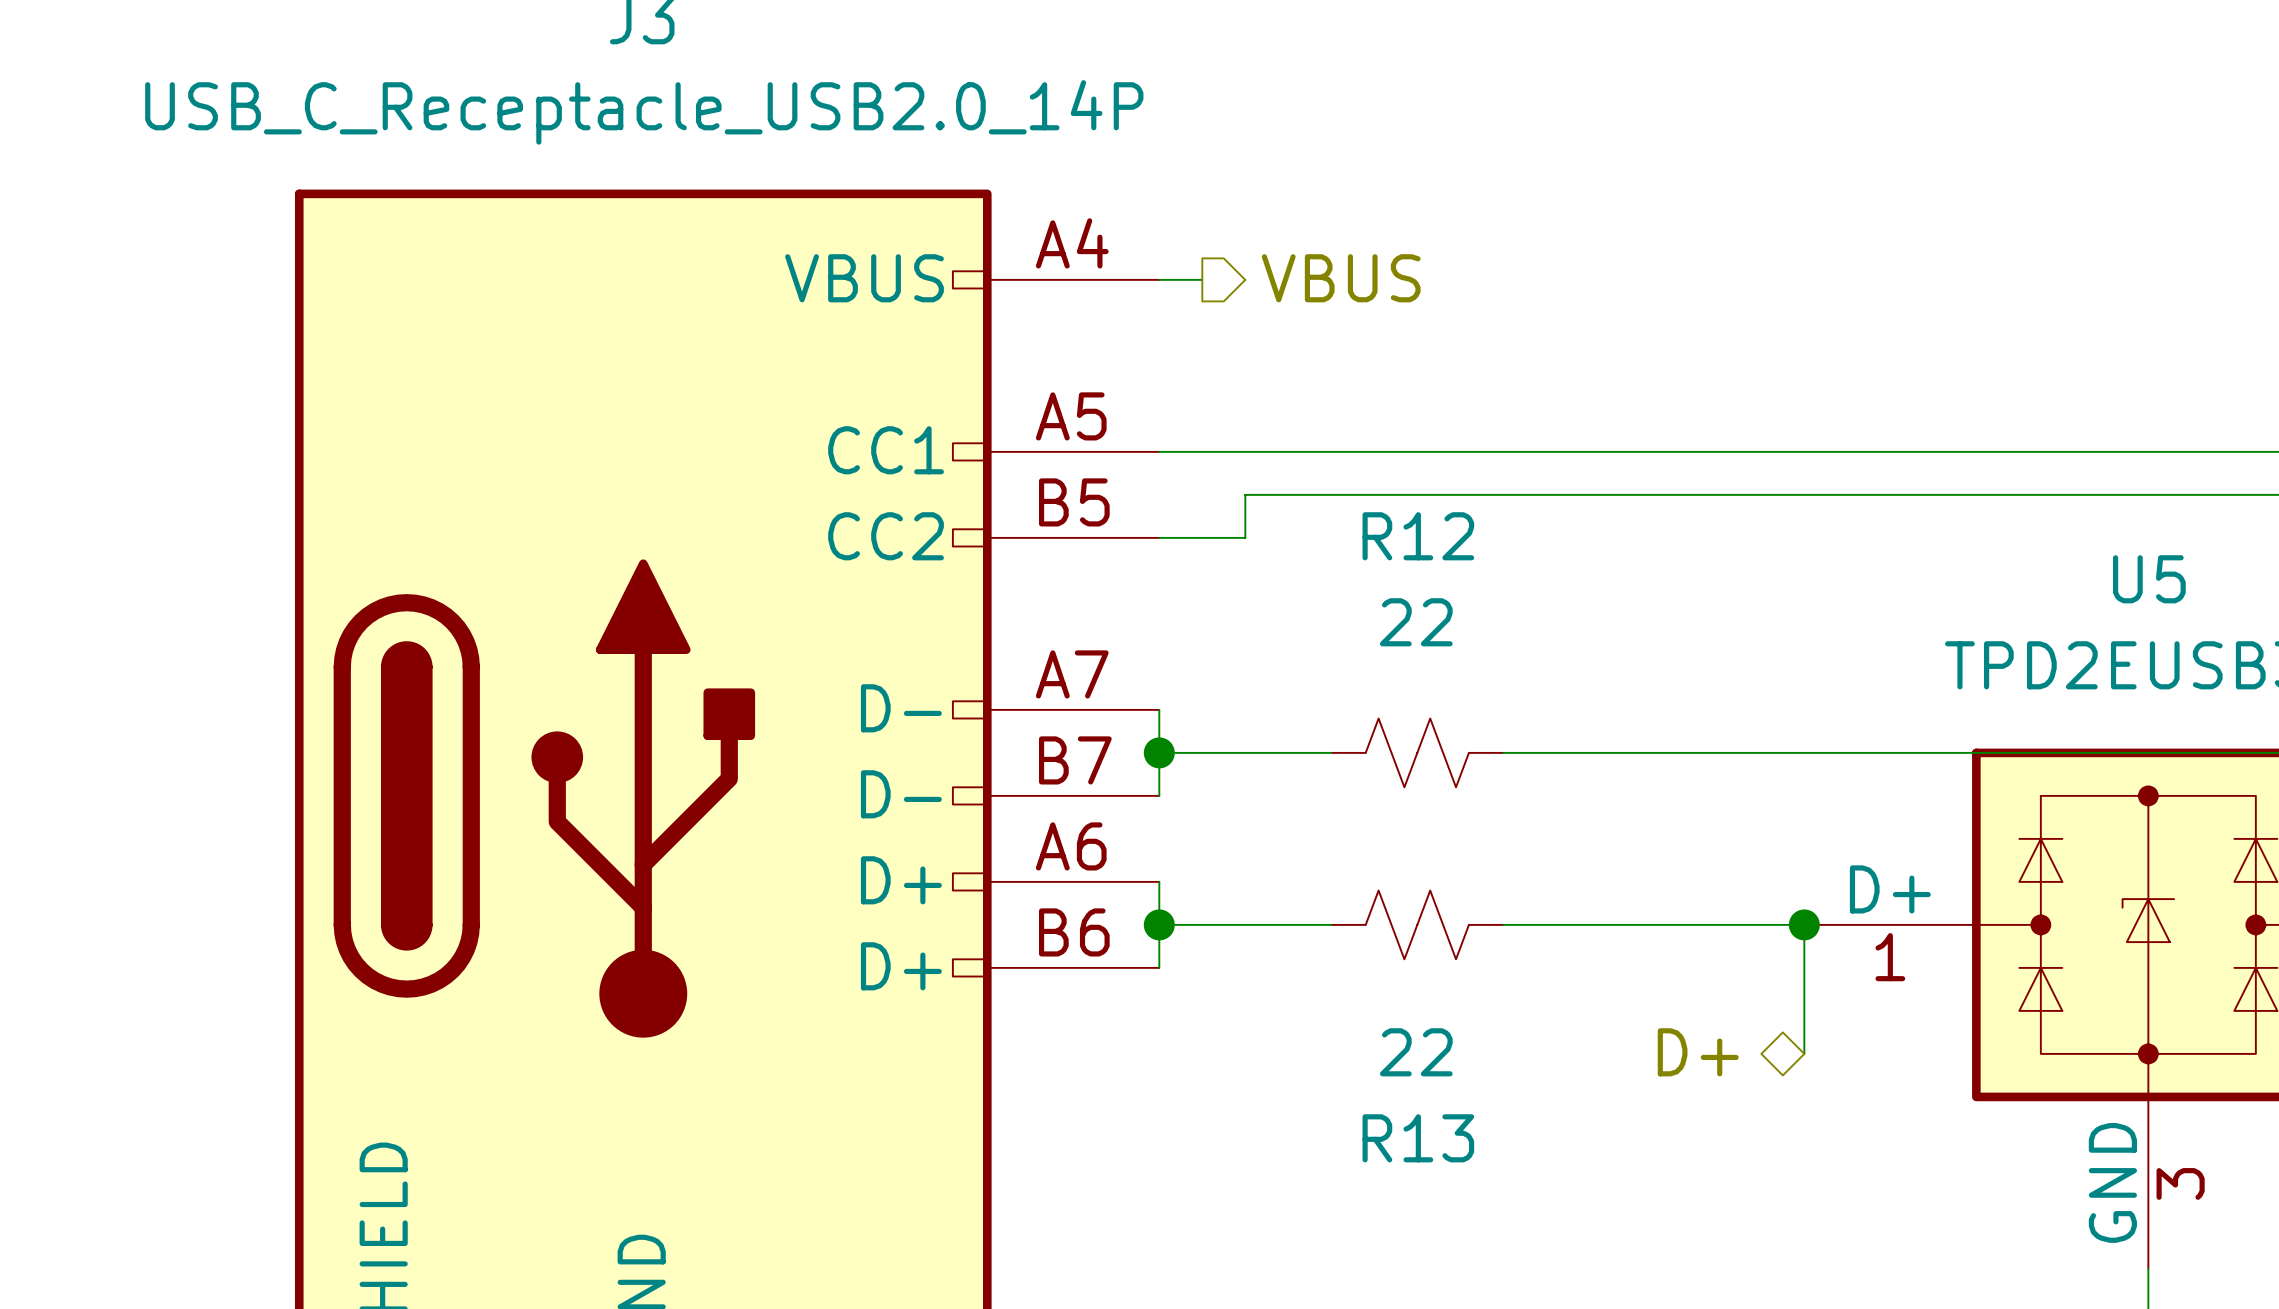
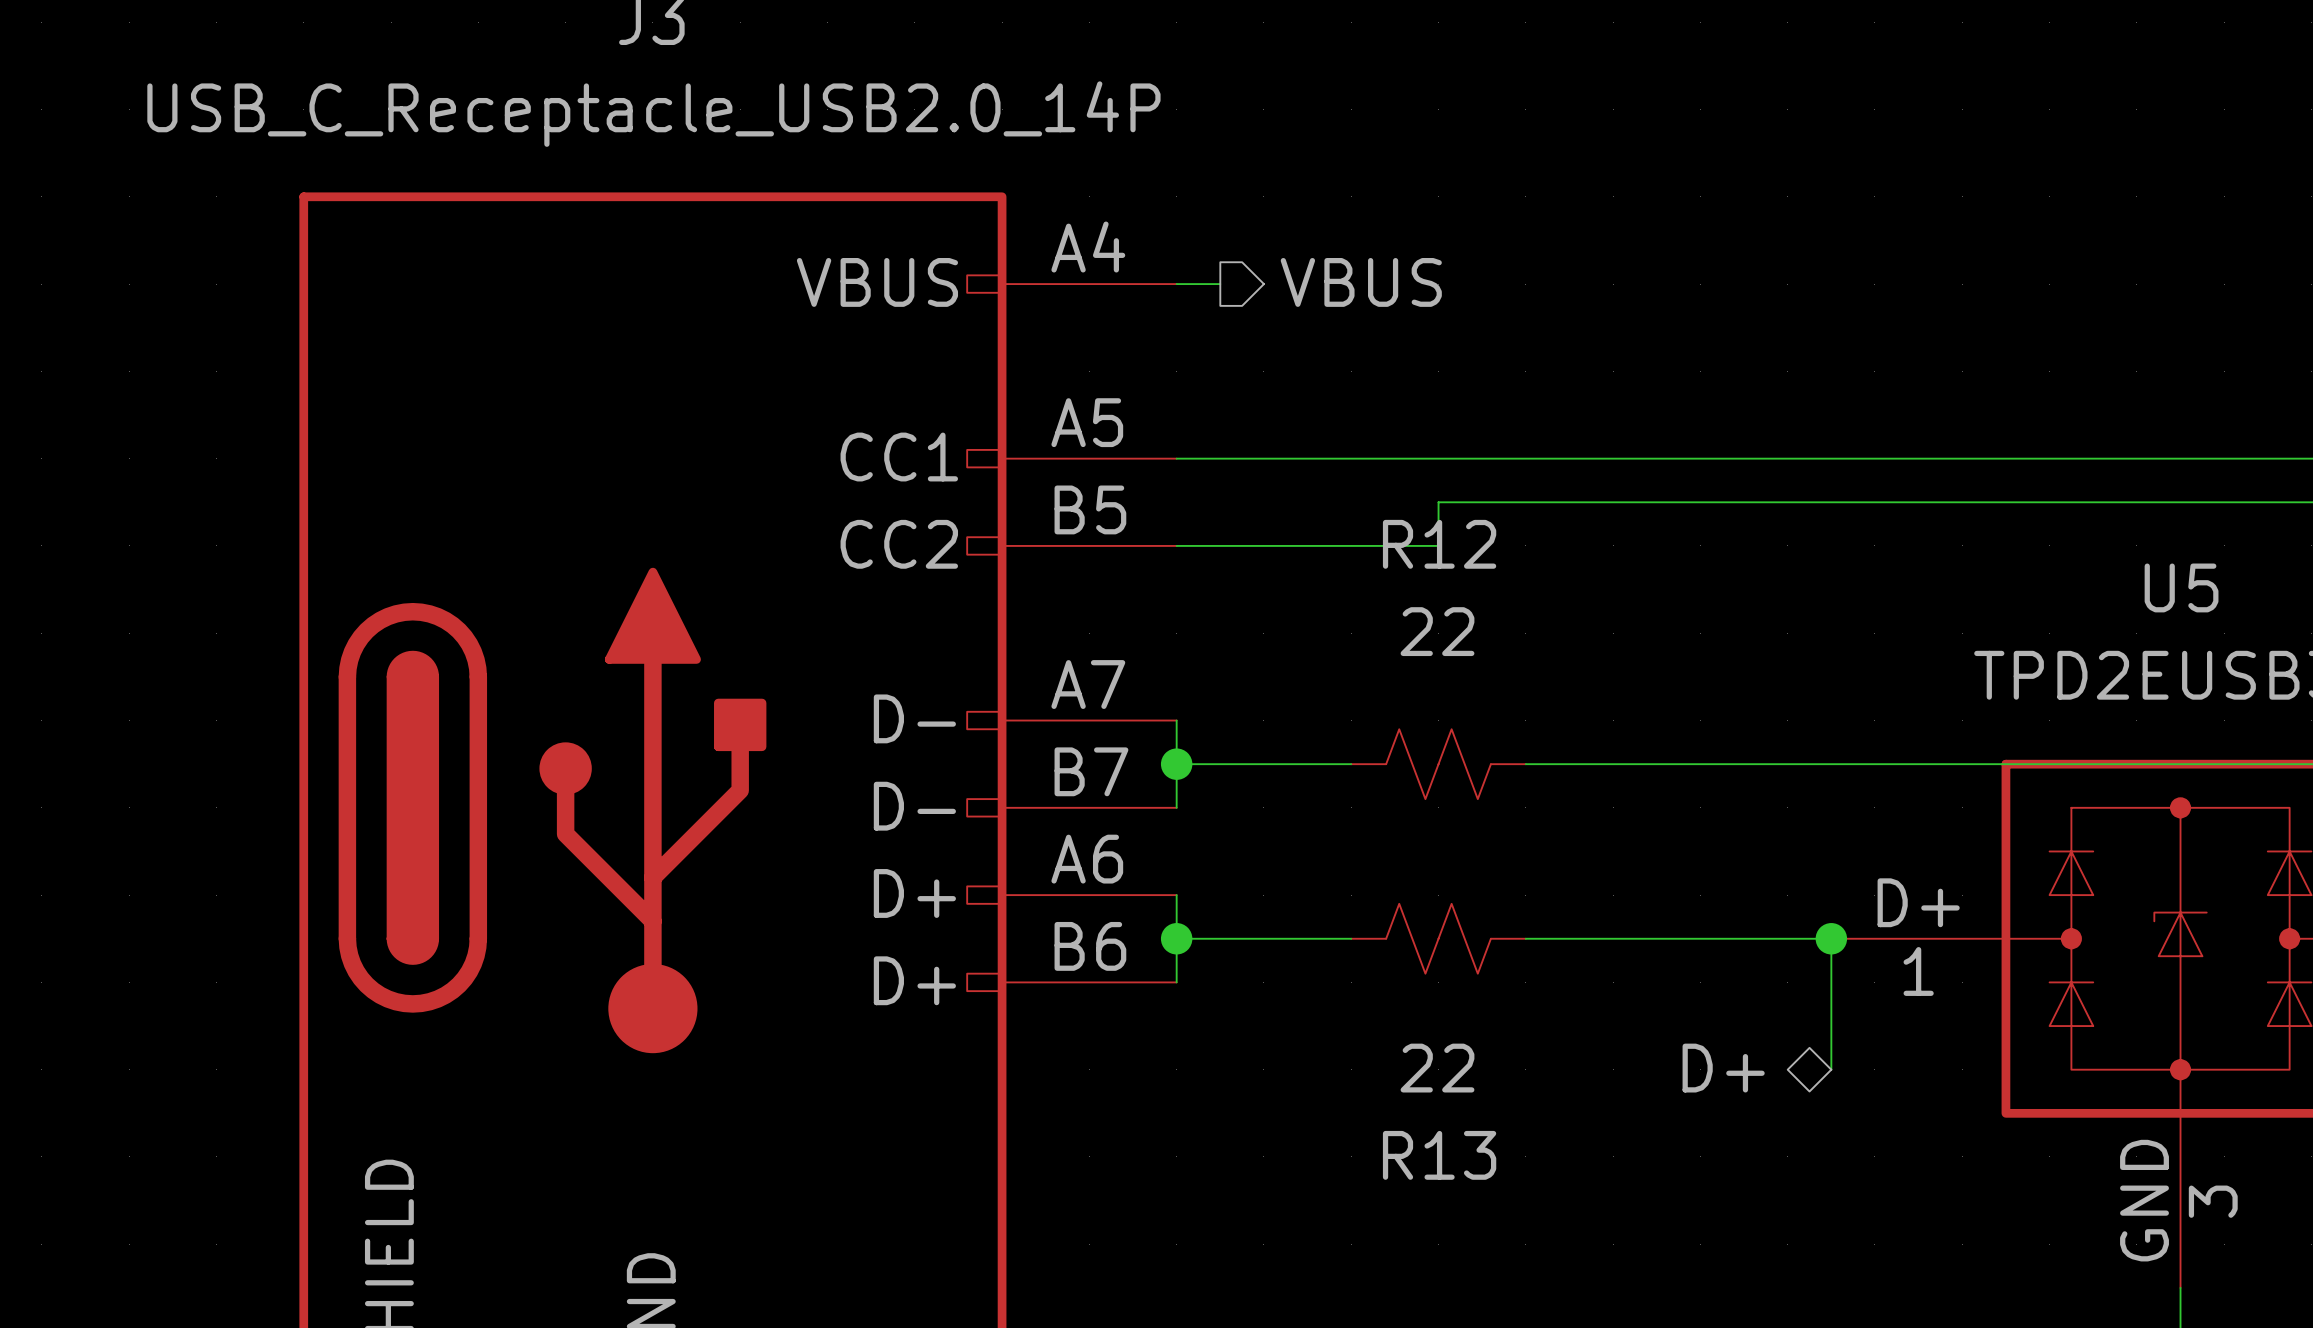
wire: (1417, 494) (1245, 494) (1245, 537) -> (1438, 502) (1438, 545) (1263, 545)

